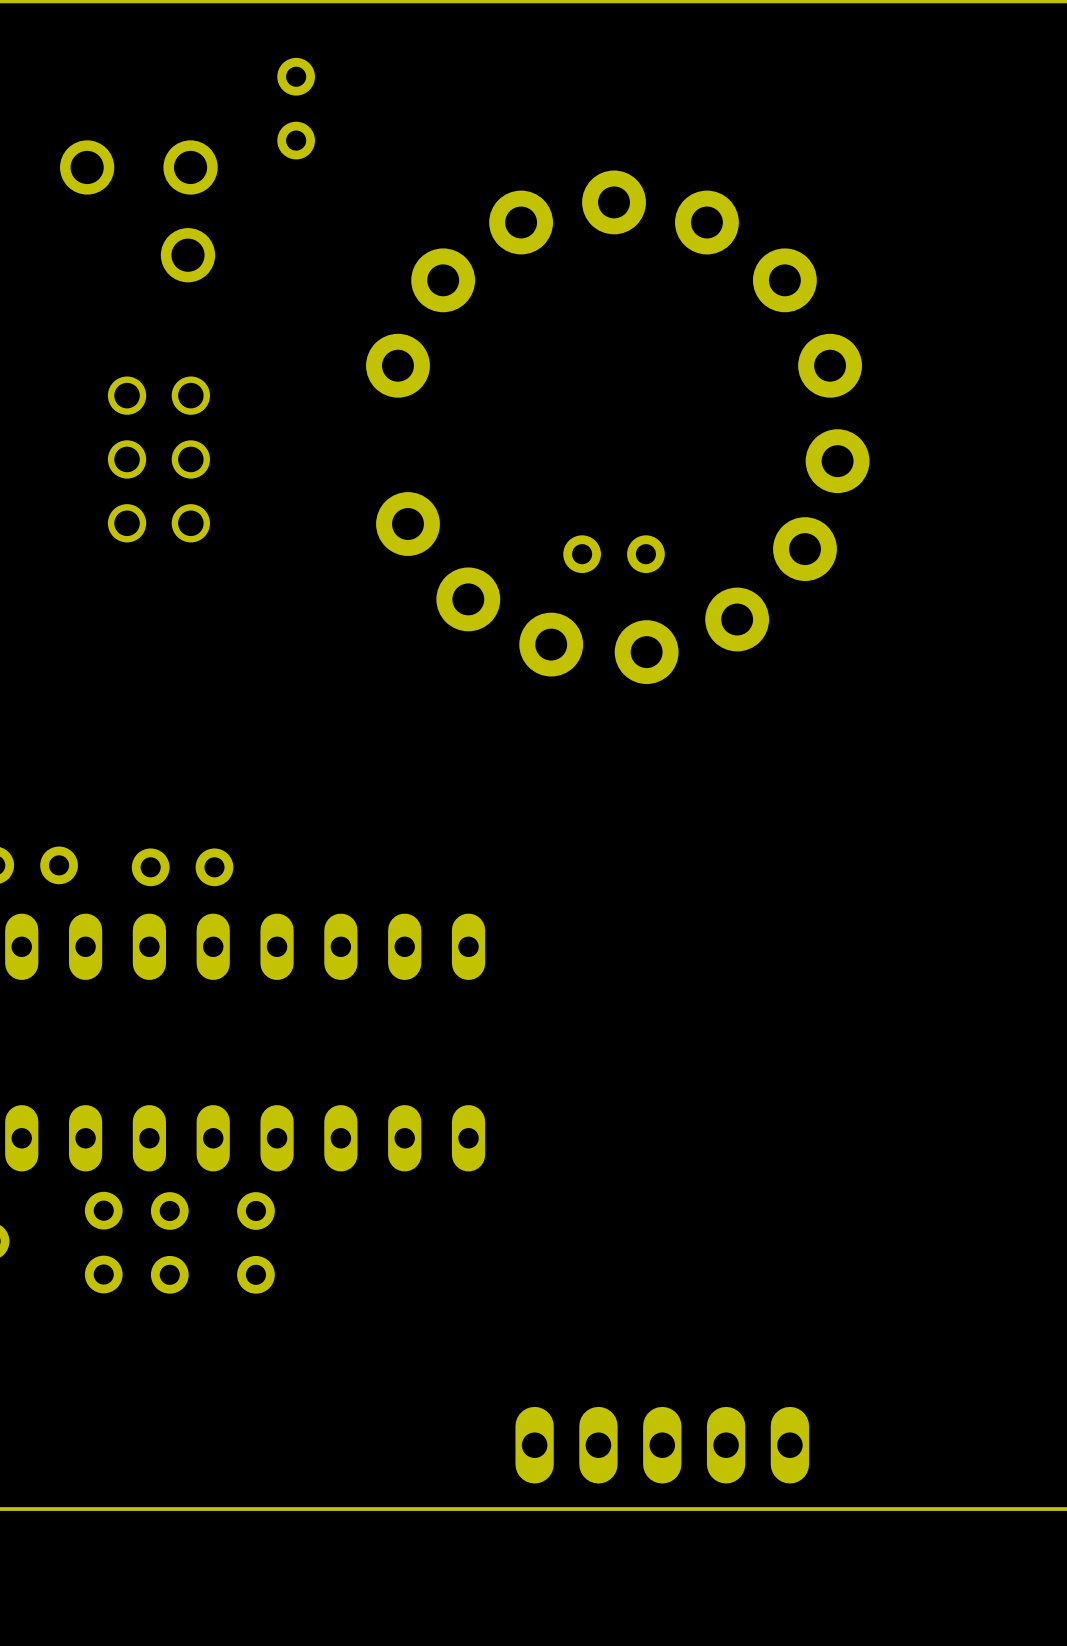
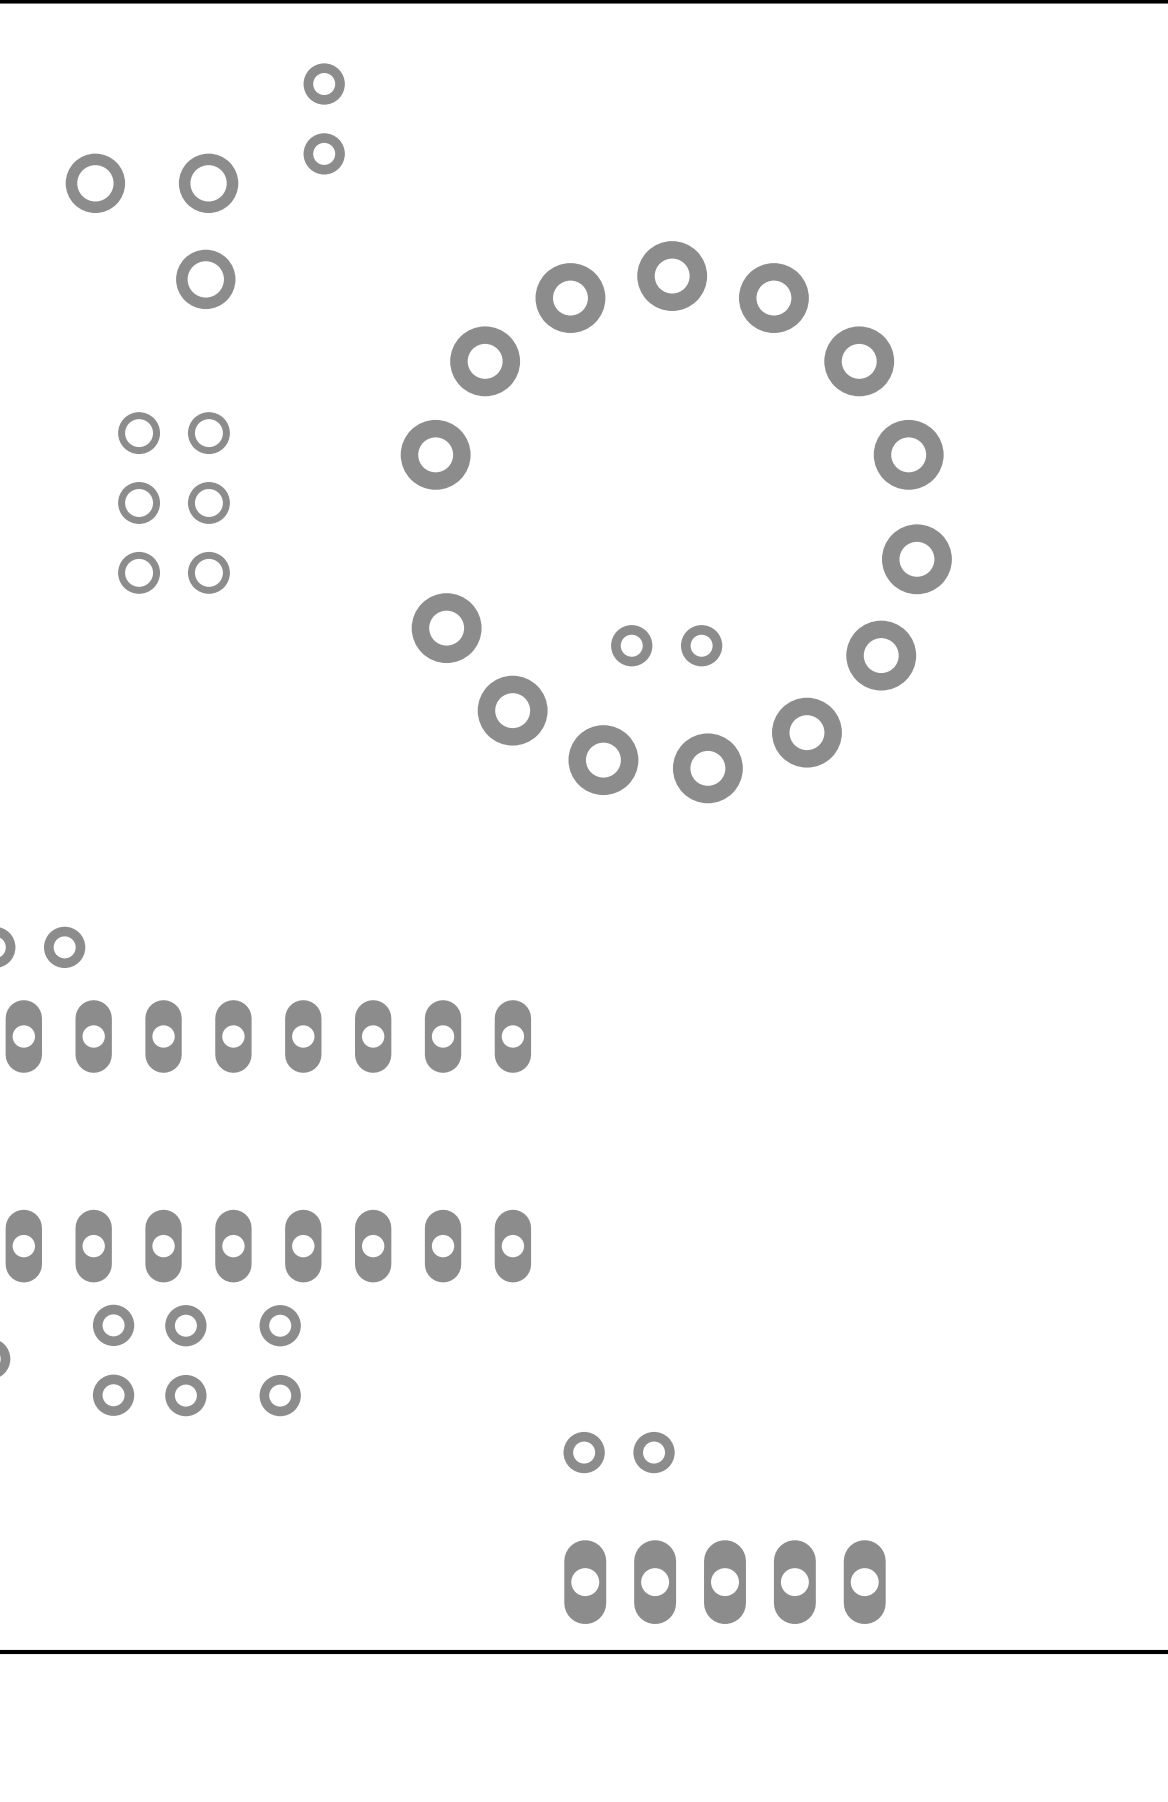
part position: (617, 427) -> (676, 522)
part position: (614, 554) -> (666, 645)
part: (182, 867) -> none
part: none -> (619, 1452)

